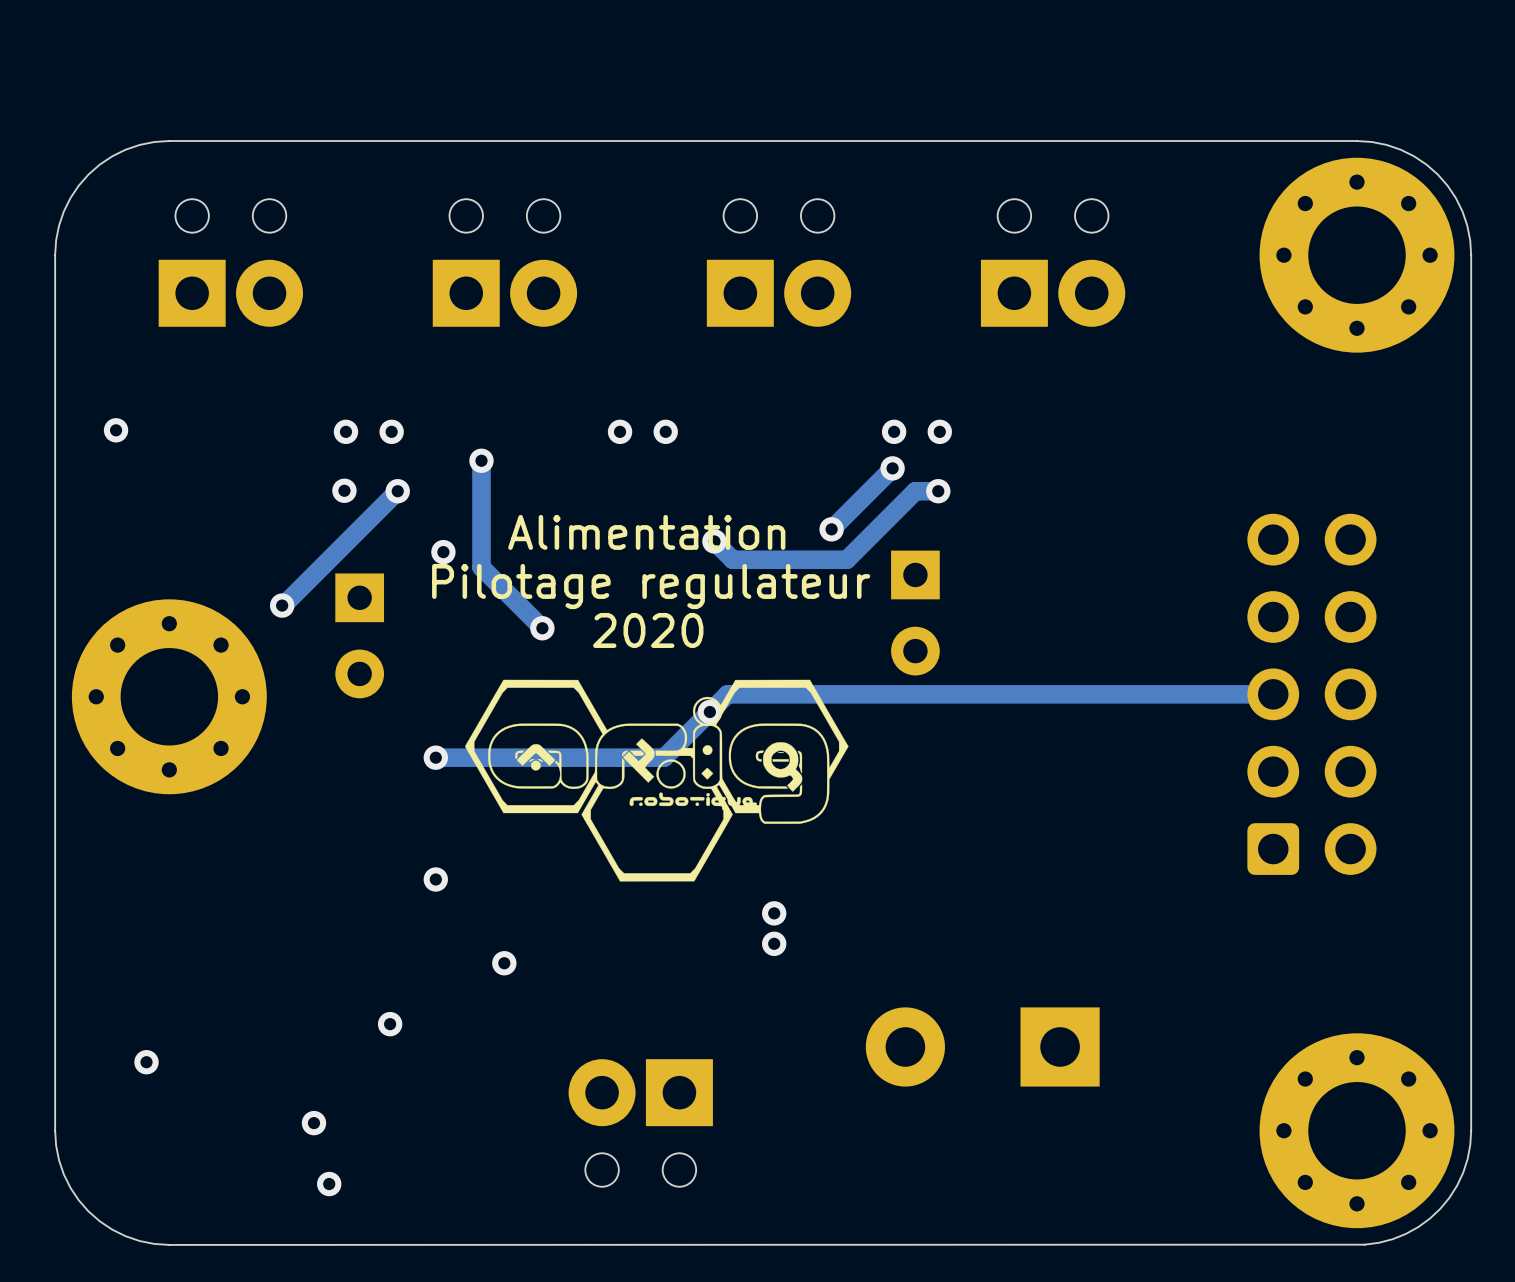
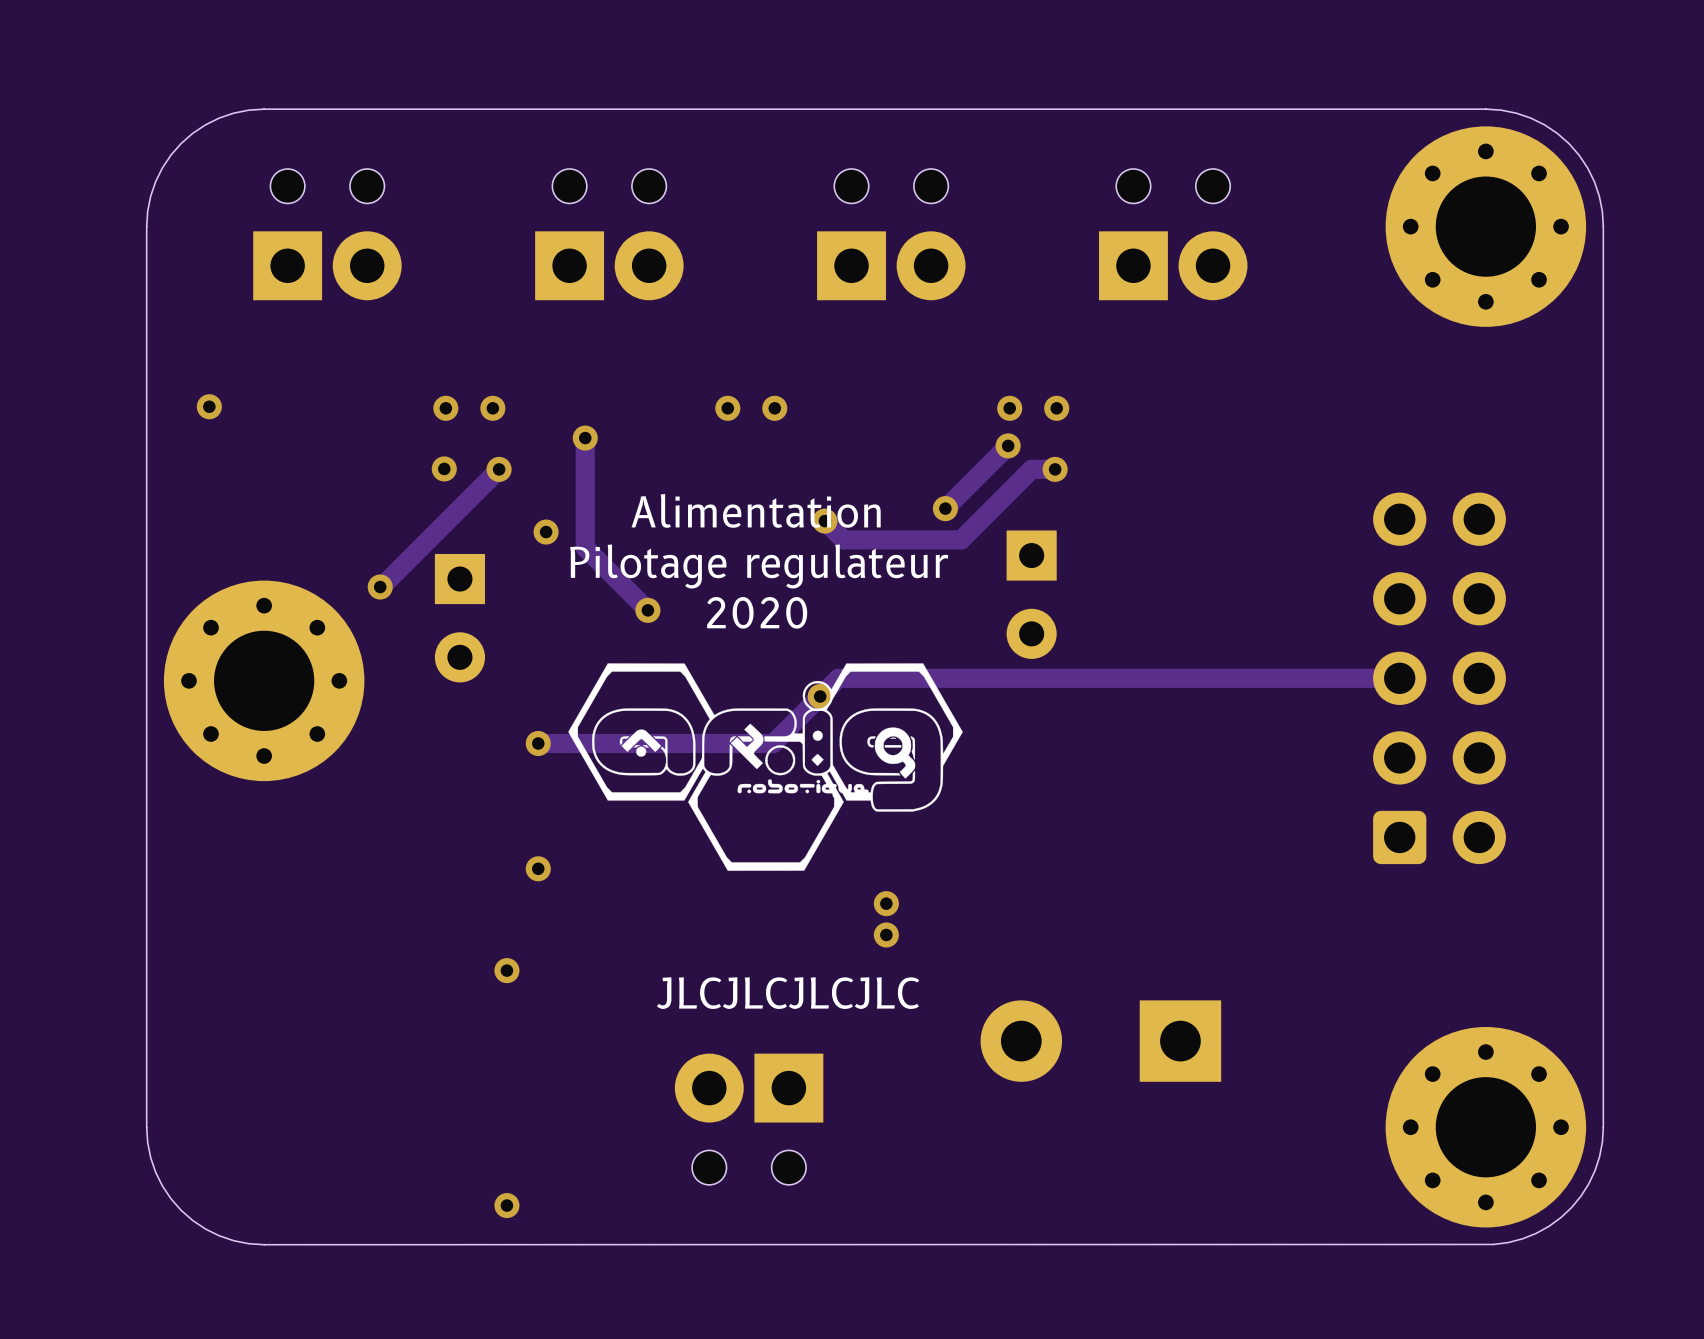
via: (504, 963) -> none
text: none -> JLCJLCJLCJLC (788, 993)
via position: (390, 1024) -> (506, 970)
via: (146, 1062) -> none
via: (313, 1123) -> none
via: (329, 1184) -> none
via: none -> (506, 1205)

